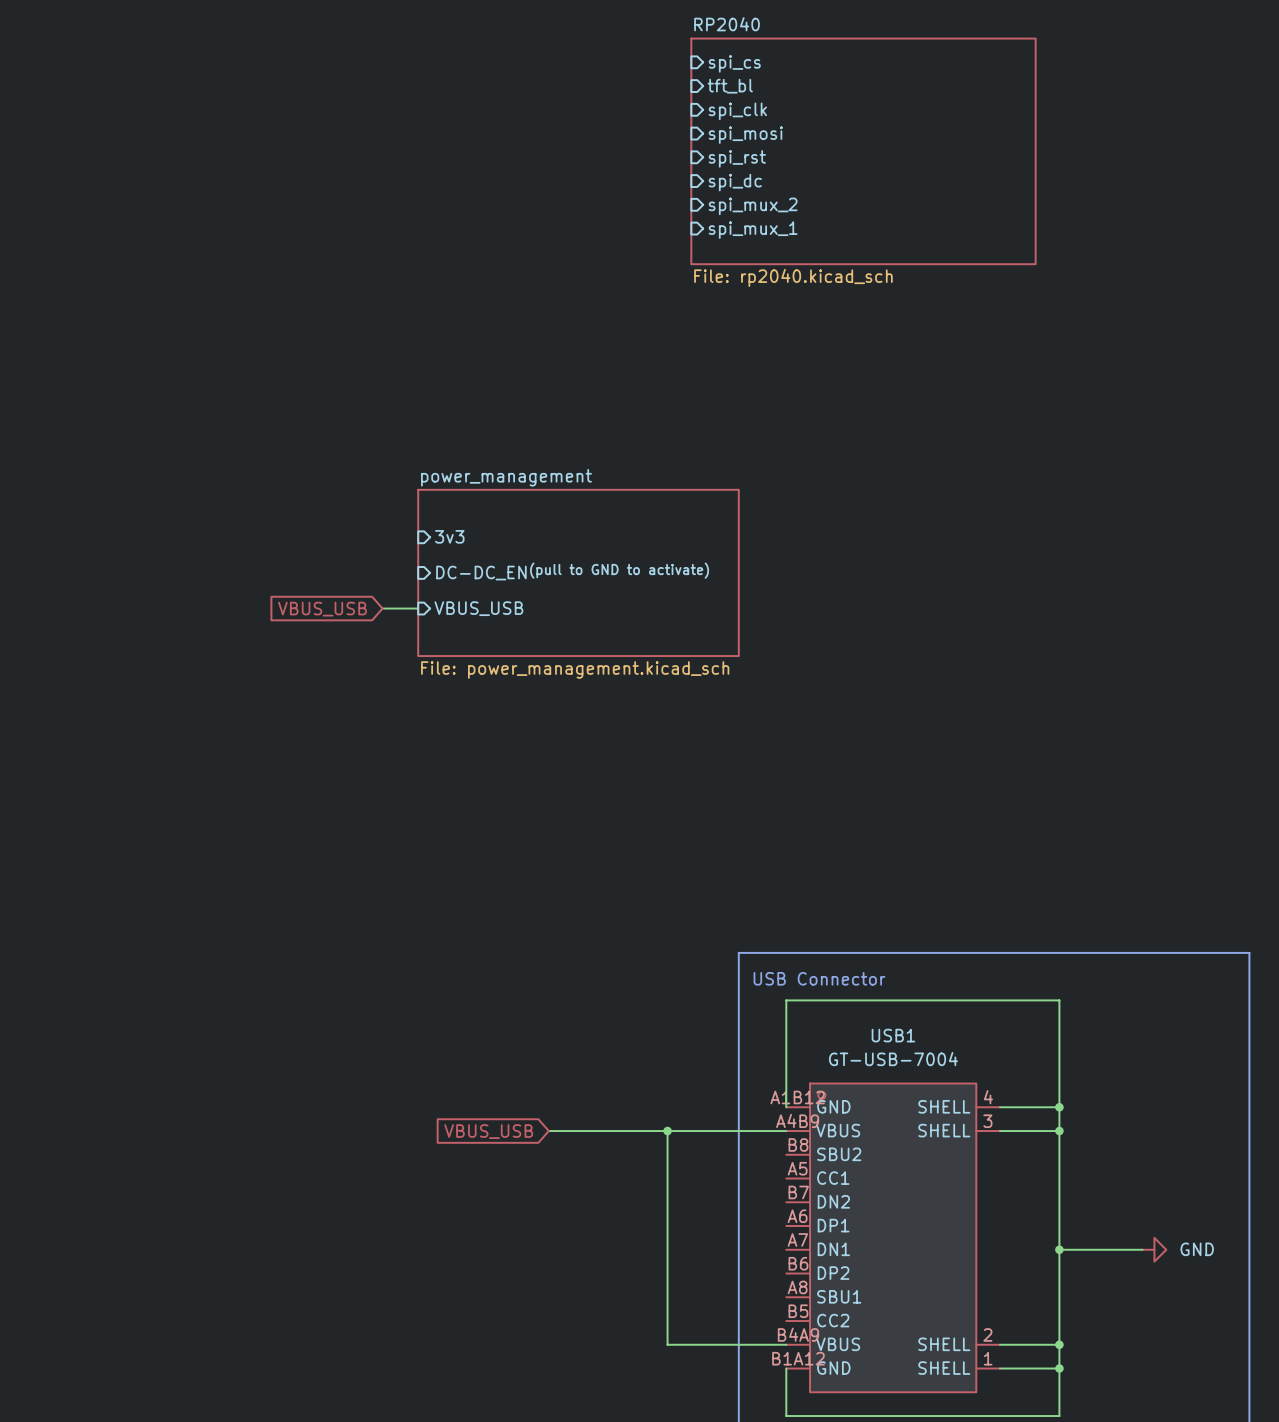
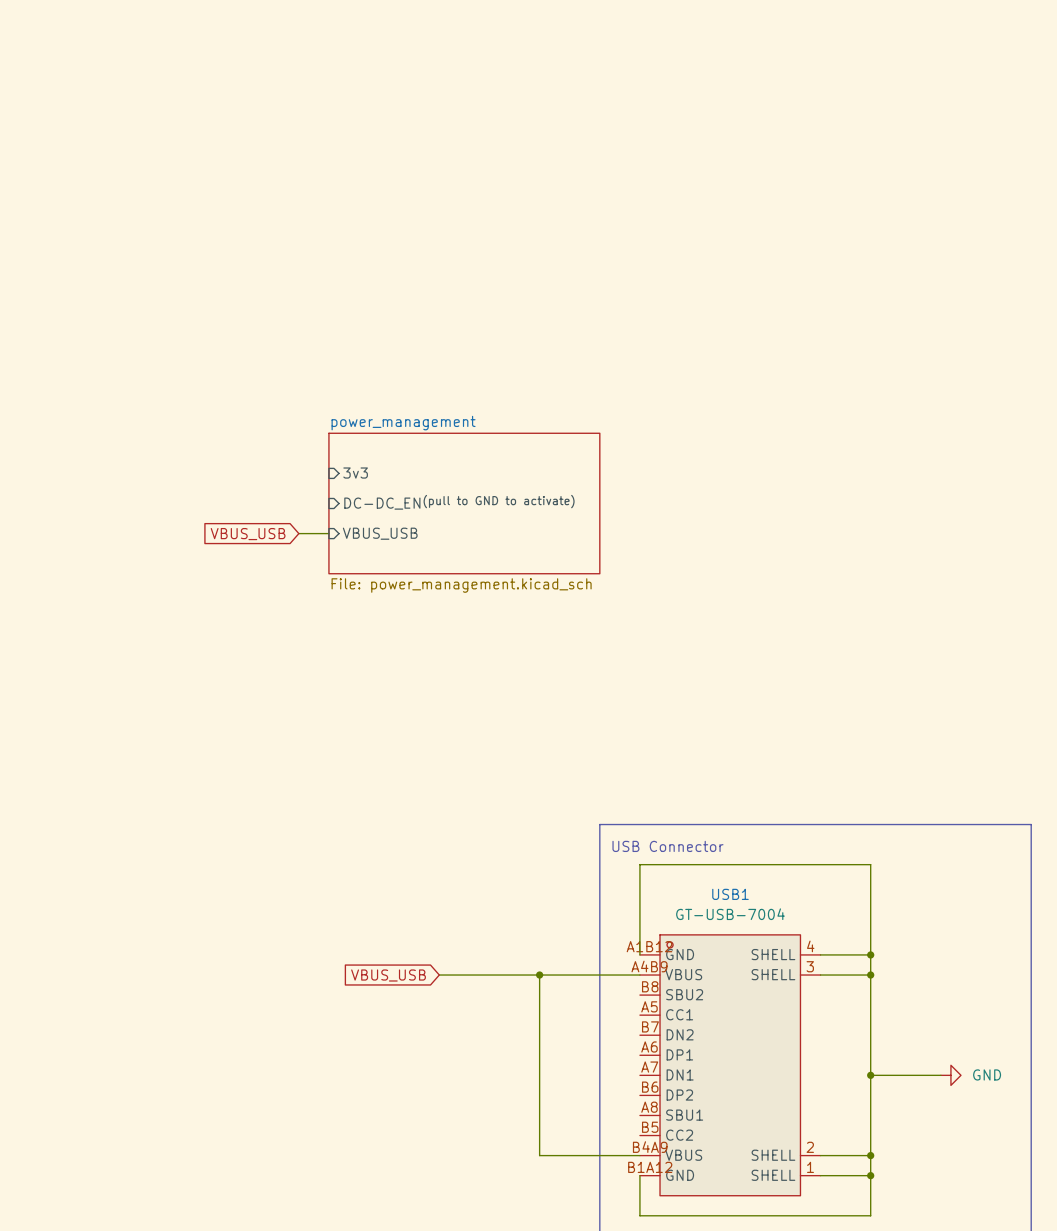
sheet pin: spi_cs (734, 63) -> none
sheet pin: tft_bl (730, 86) -> none
sheet pin: spi_clk (737, 111) -> none
sheet pin: spi_mosi (745, 135) -> none
sheet RP2040: File: rp2040.kicad_sch (863, 151) -> none
sheet pin: spi_rst (737, 158) -> none
sheet pin: spi_dc (735, 182) -> none
sheet pin: spi_mux_2 (753, 206) -> none
sheet pin: spi_mux_1 (753, 230) -> none

